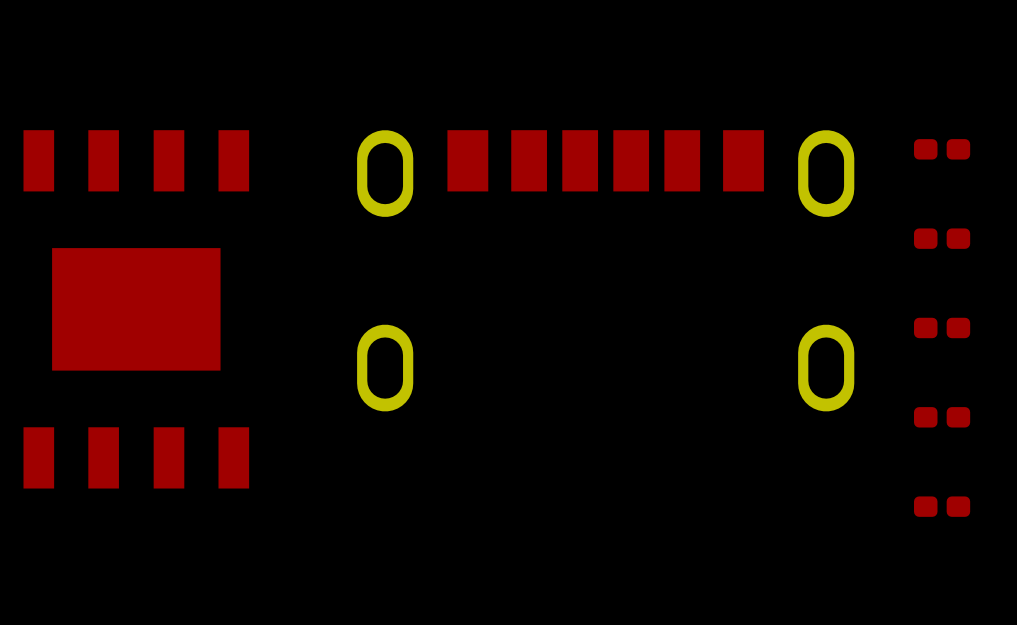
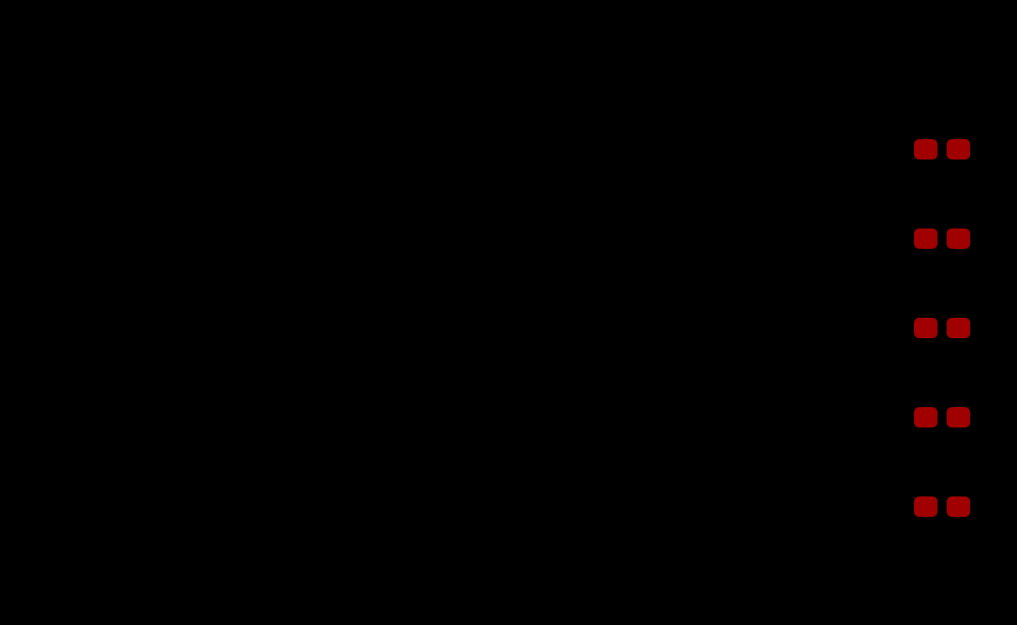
part: (605, 270) -> none
part: (136, 309) -> none

